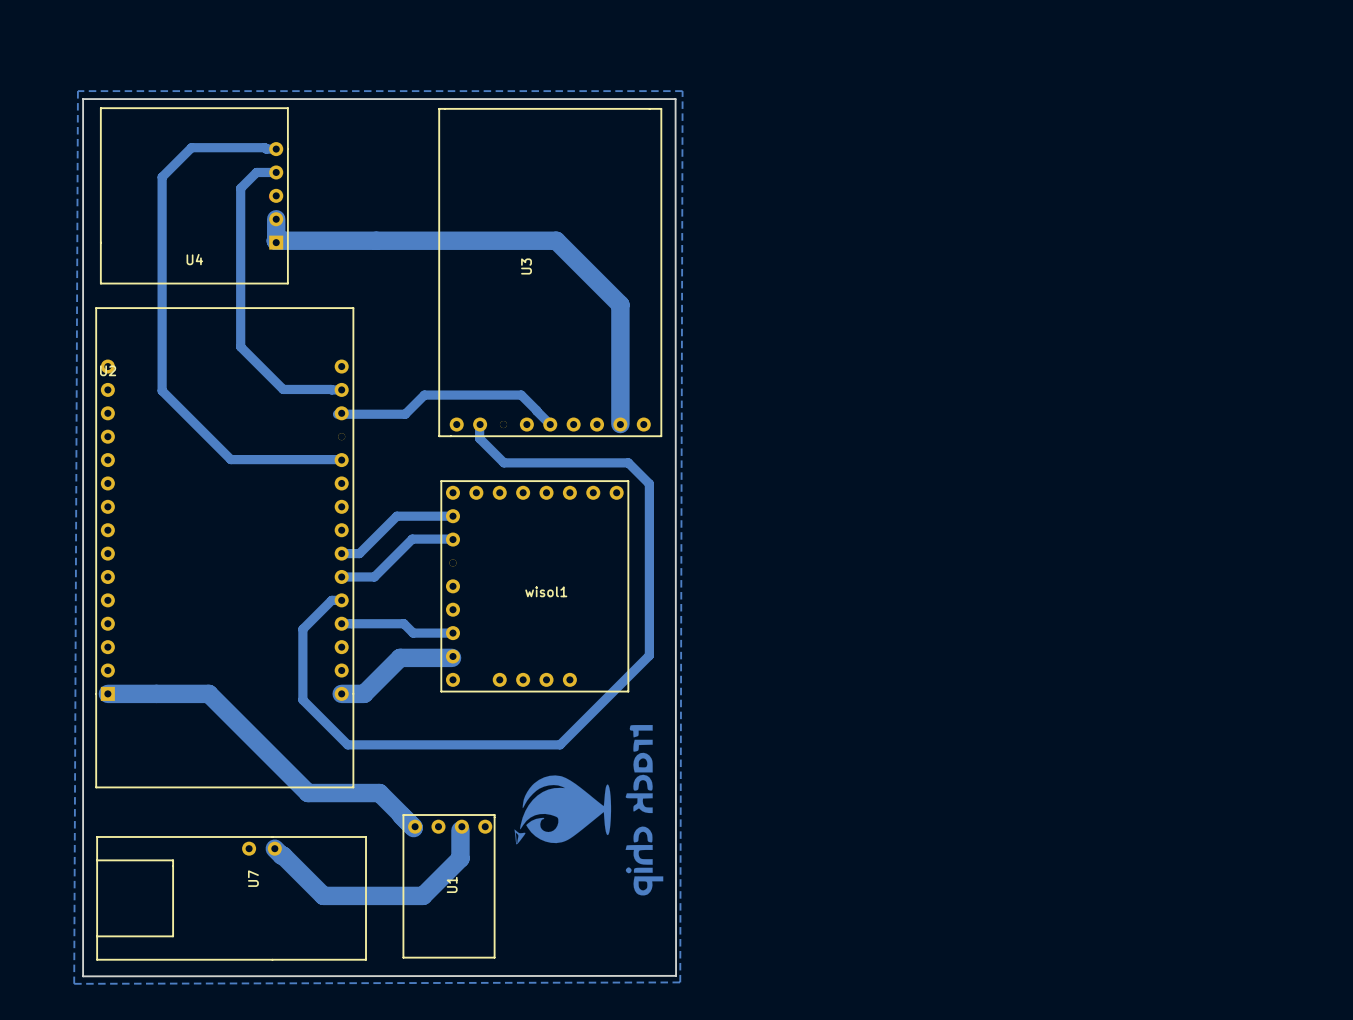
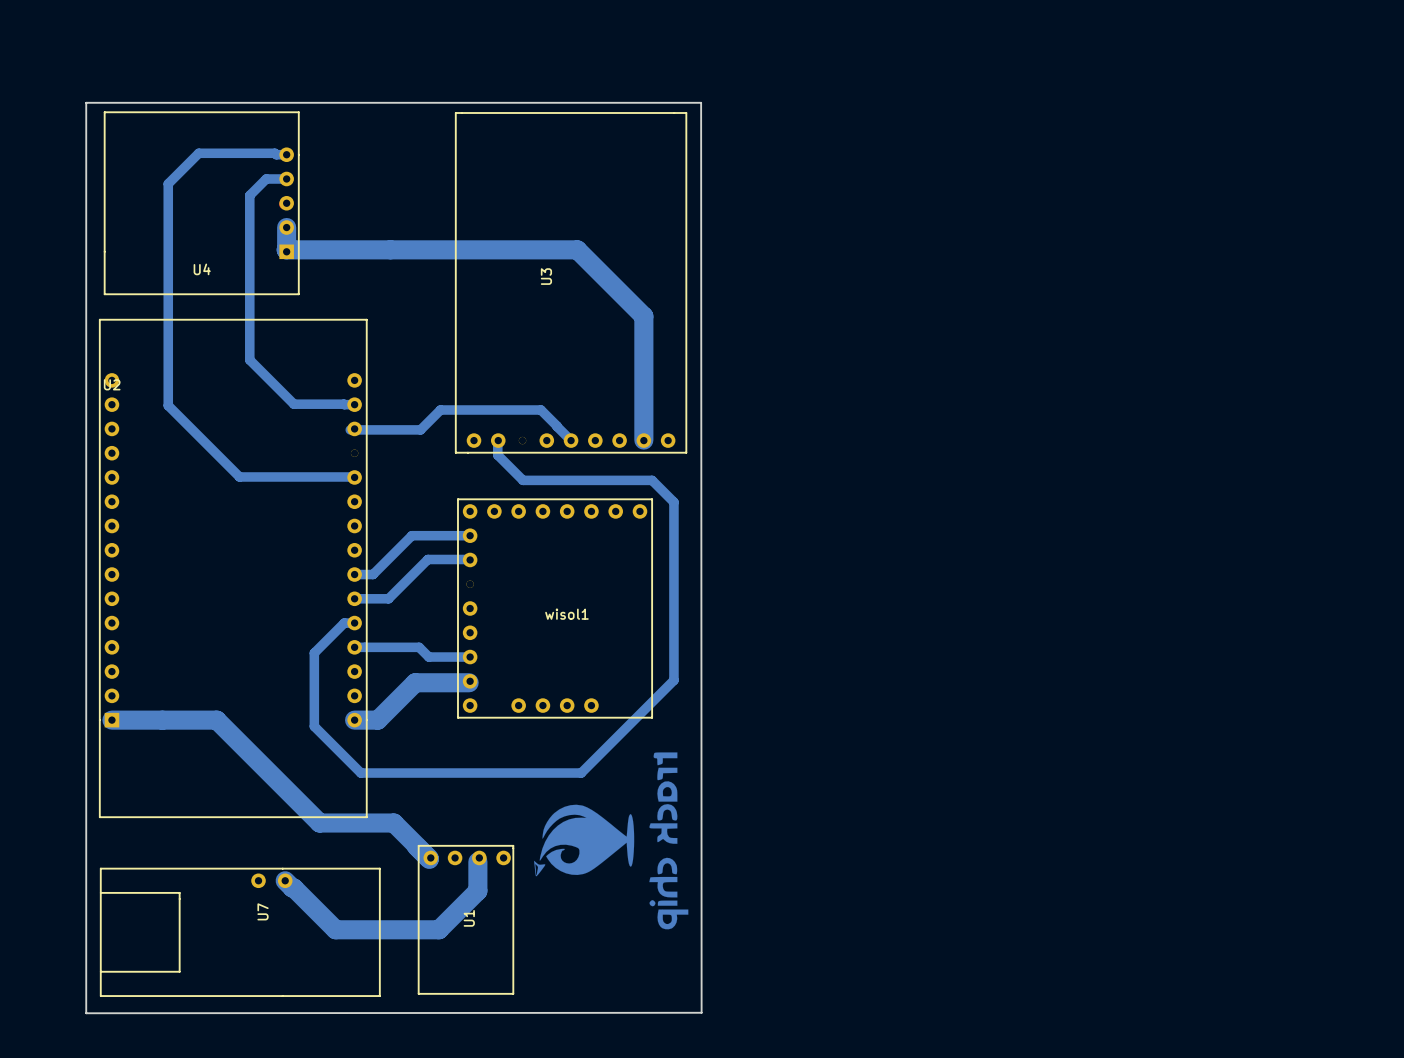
bottom zone outline: (77, 91) (74, 983) (680, 982) (682, 91) (77, 91) -> none

